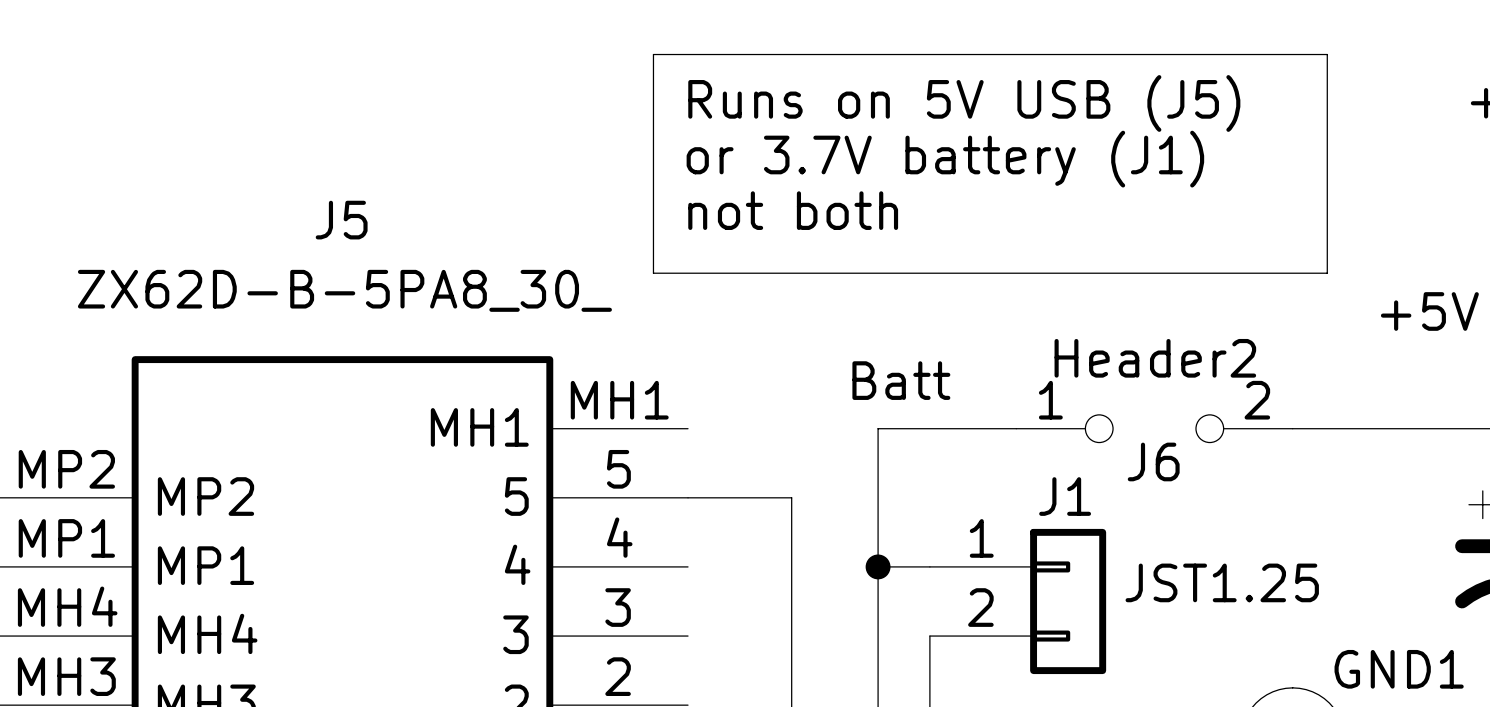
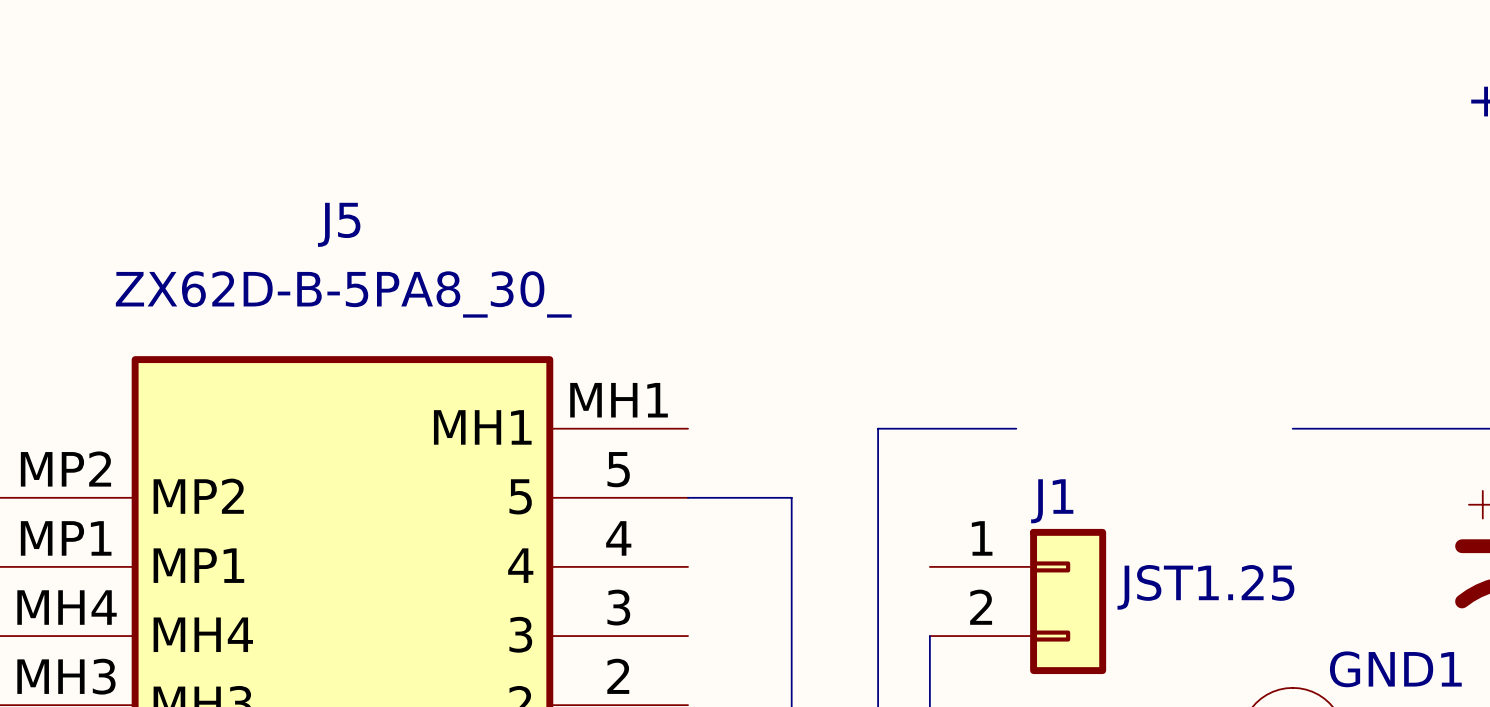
line: (653, 54) (1327, 54) (1327, 273) (653, 273) (653, 54) -> none
text: Runs on 5V USB (J5) (964, 103) -> none
text: or 3.7V battery (J1) (945, 159) -> none
text: not both (793, 210) -> none
label: +5V (1429, 311) -> none
label: Batt (901, 380) -> none
J6: Header2 (1154, 428) -> none
wire: (878, 566) (929, 566) -> none
junction: (878, 566) -> none

